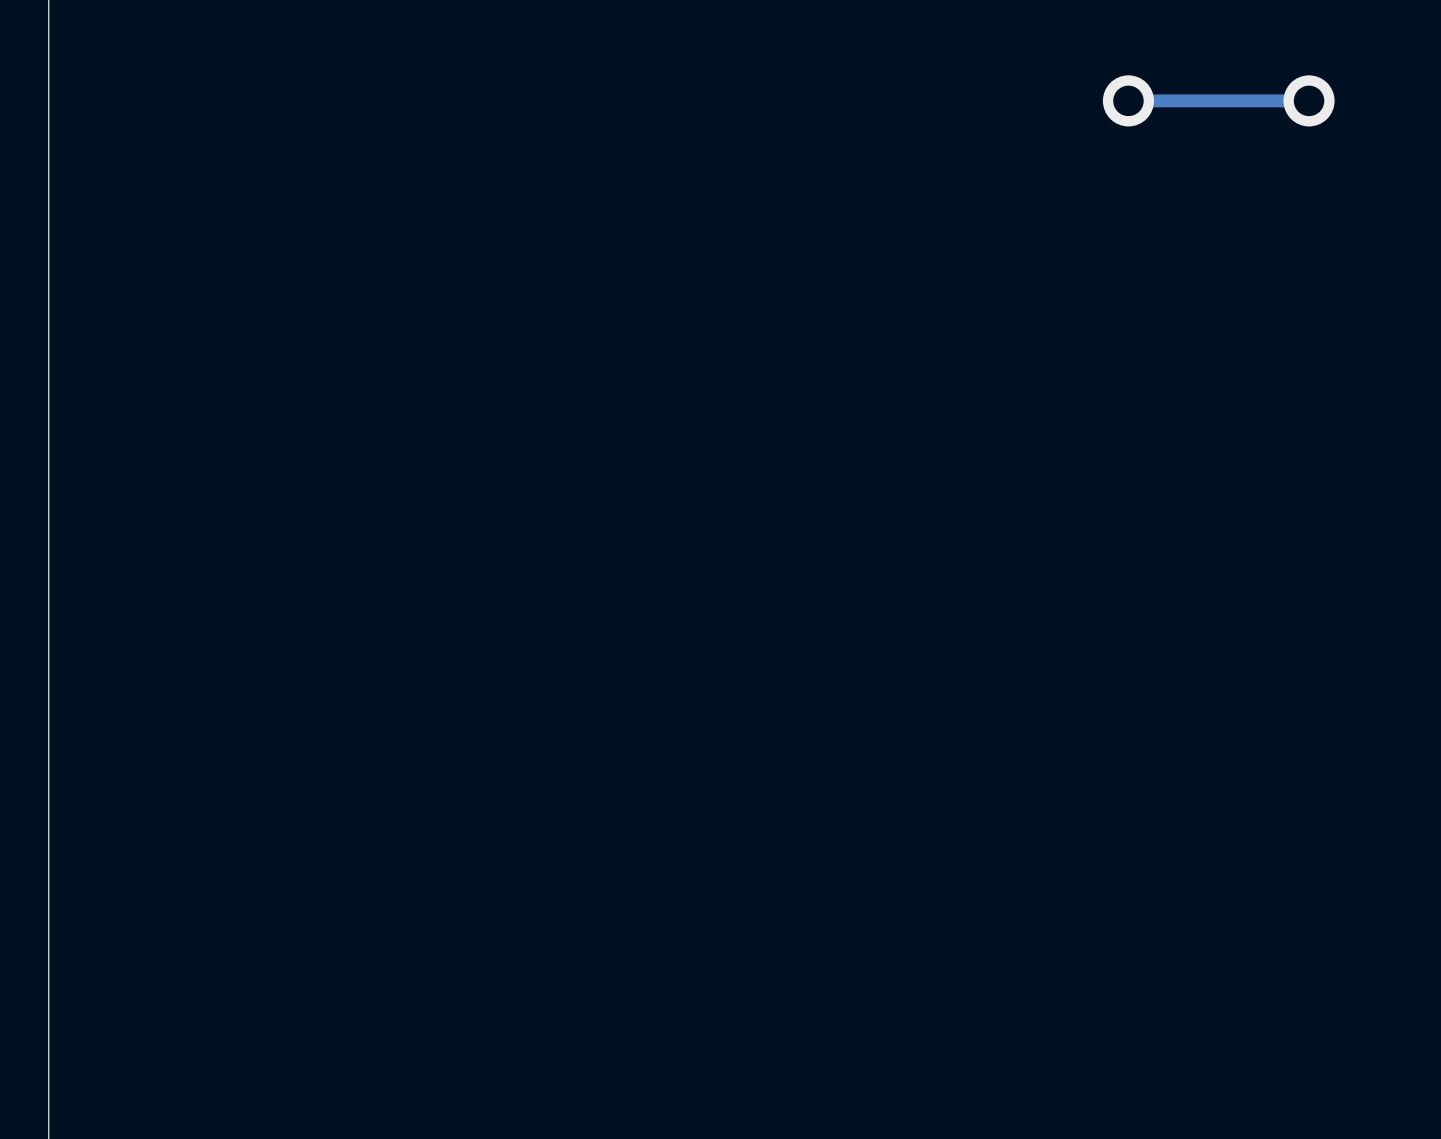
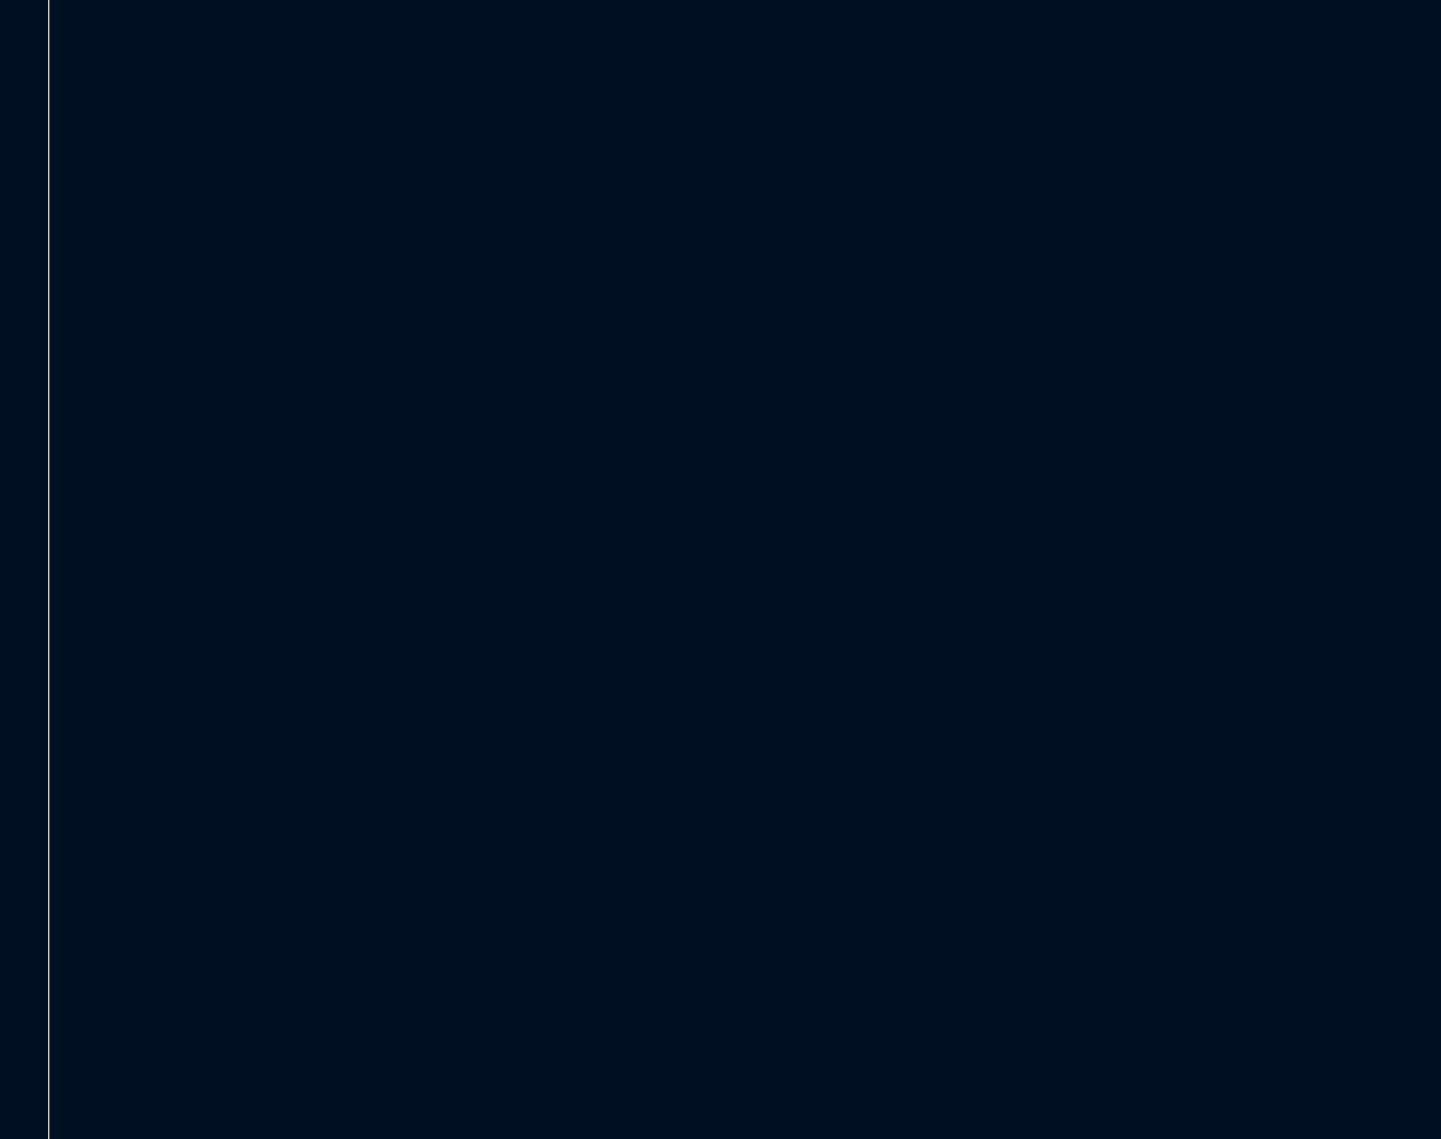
via: (1128, 100) -> none
track: (1309, 100) (1128, 100) -> none
via: (1309, 100) -> none

